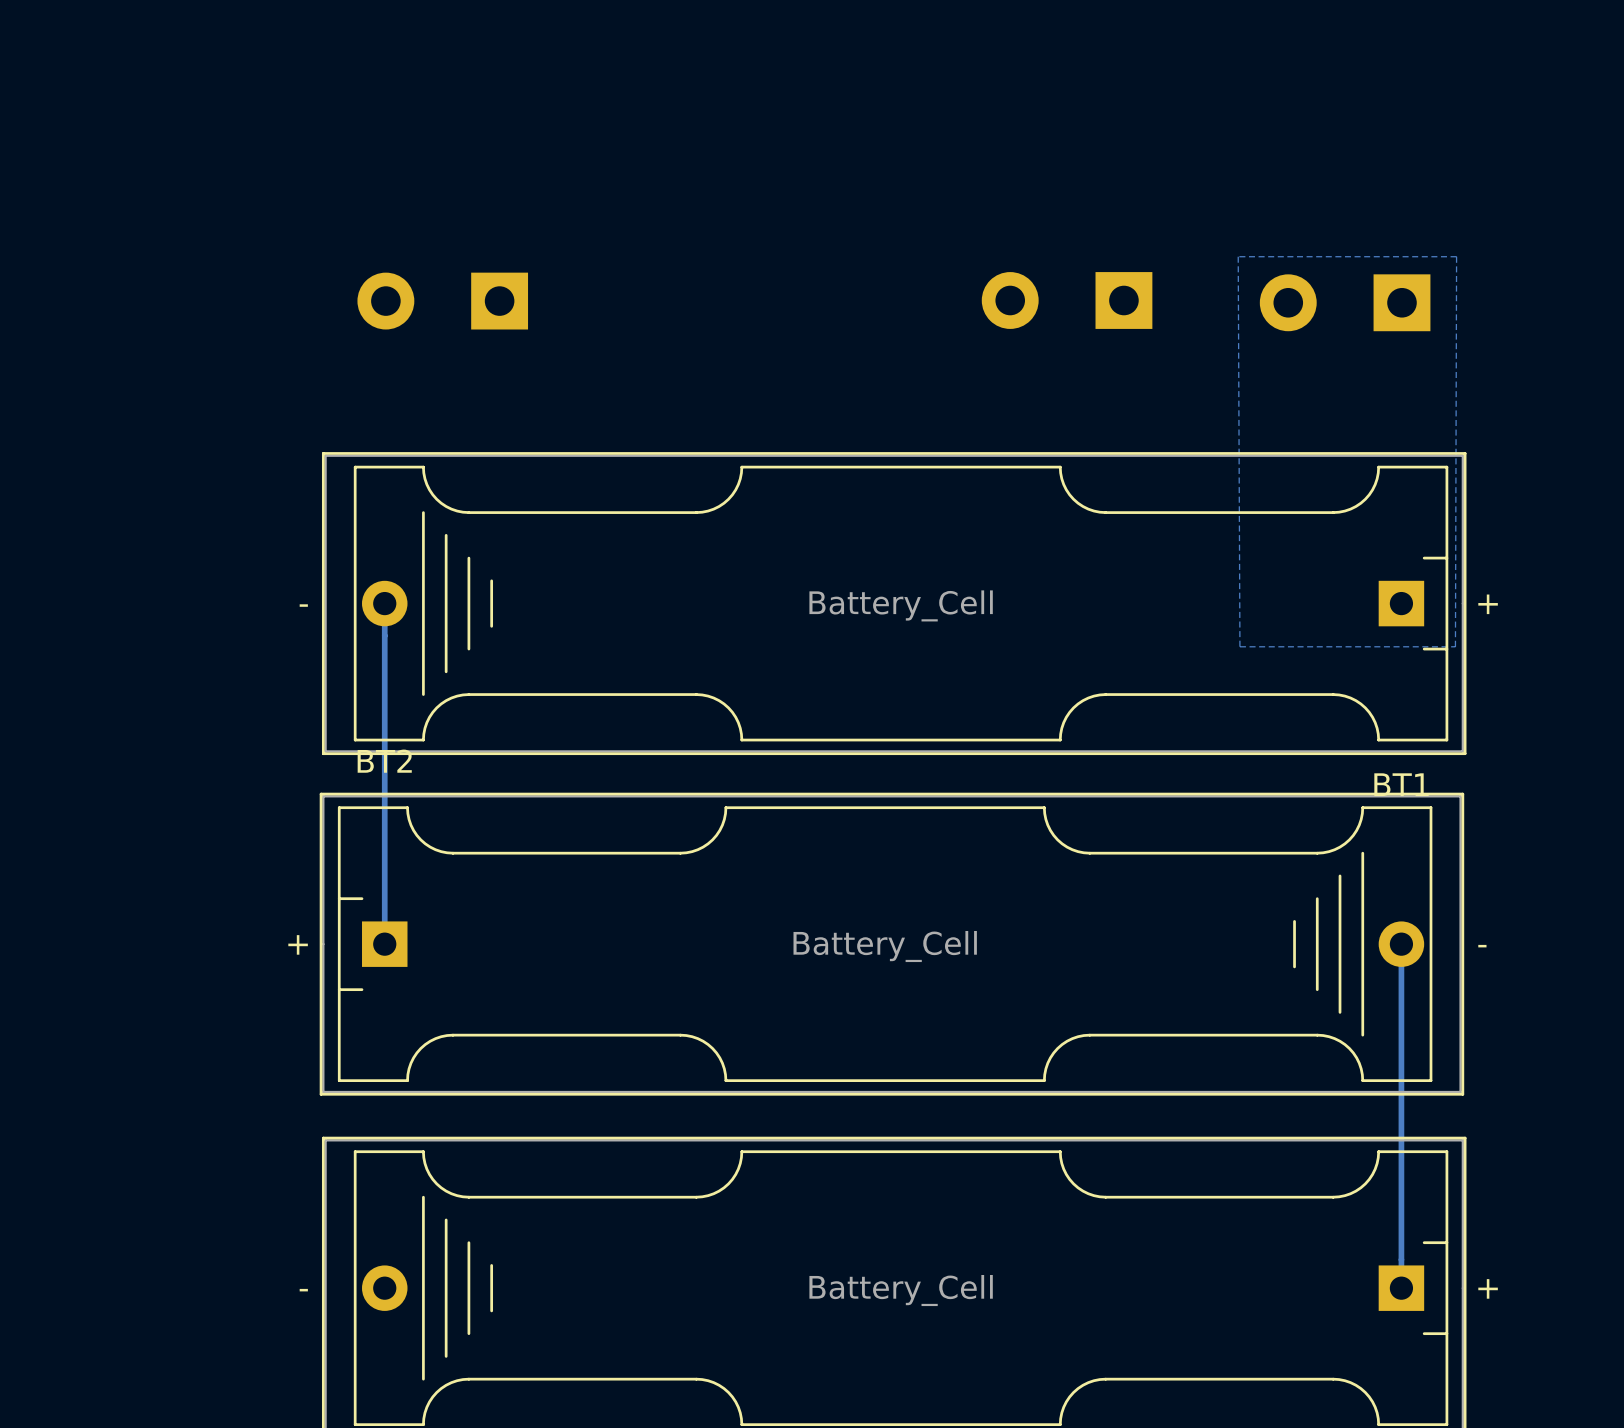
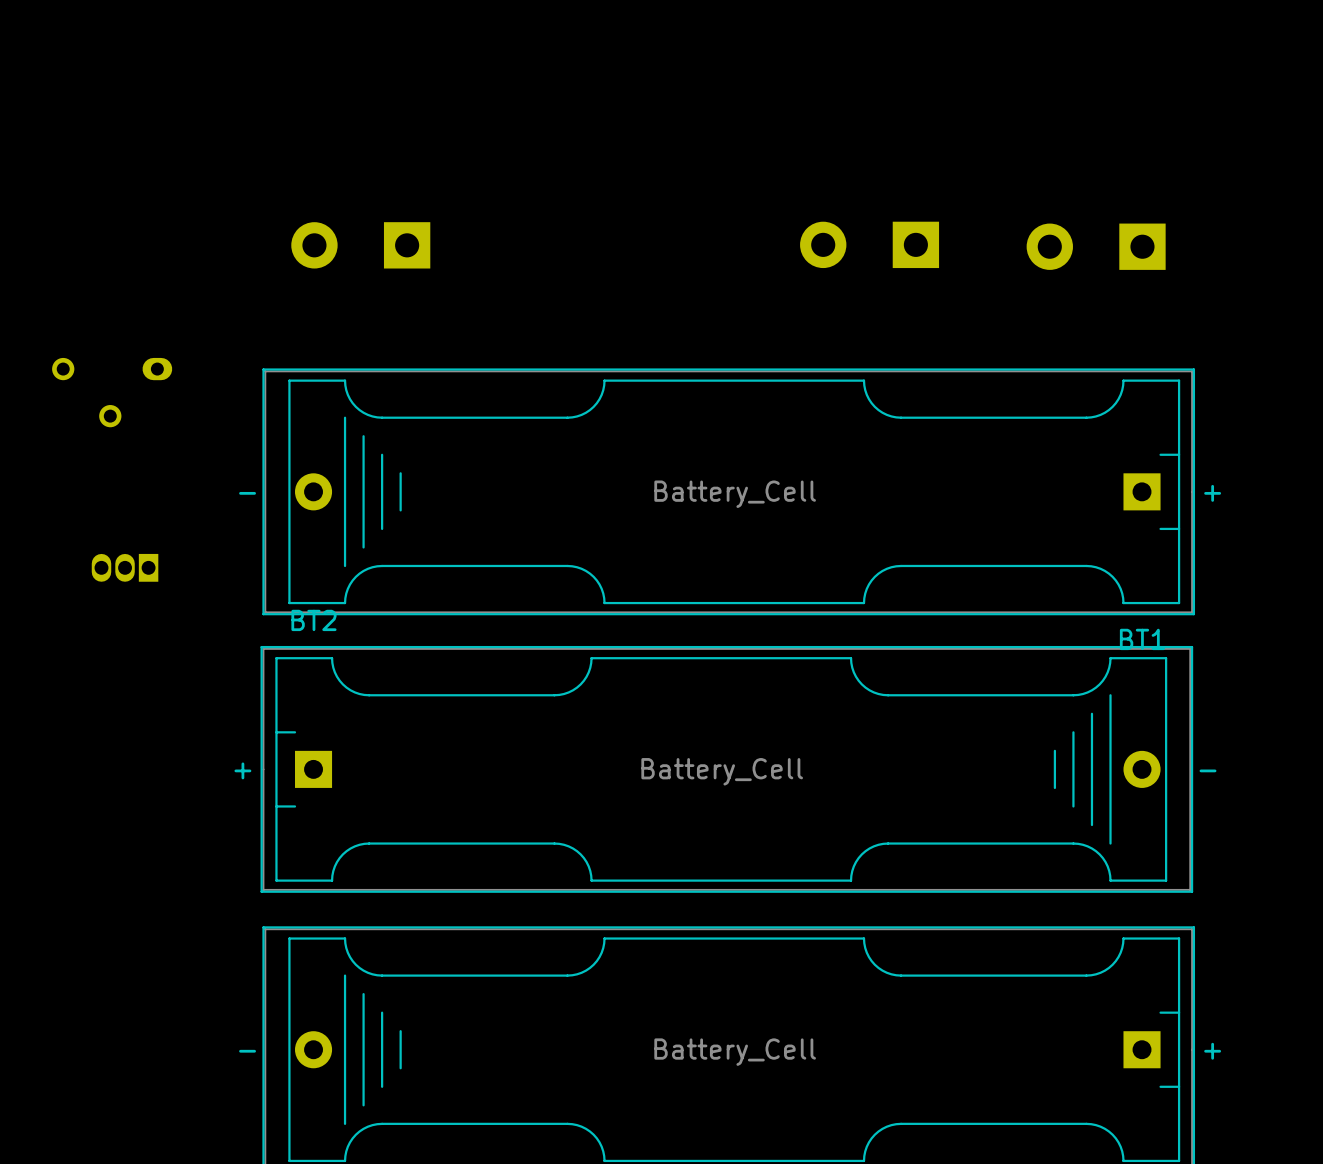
zone outline: (1456, 256) (1455, 646) (1239, 646) (1238, 256) (1456, 256) -> none
part: none -> (112, 392)
track: (384, 603) (384, 944) -> none
part: none -> (125, 567)
track: (1401, 944) (1401, 1288) -> none

